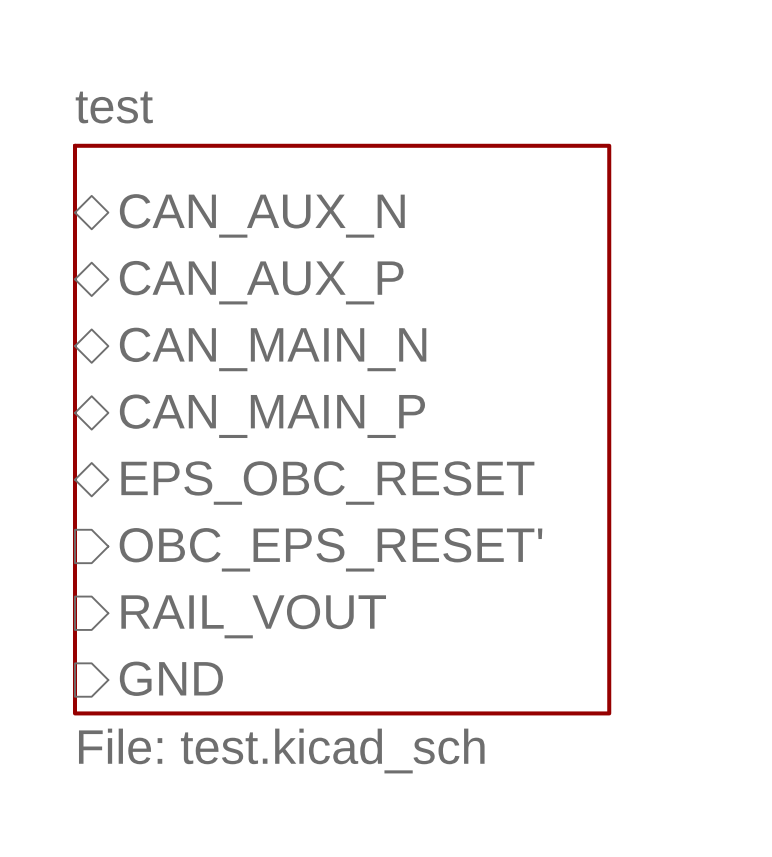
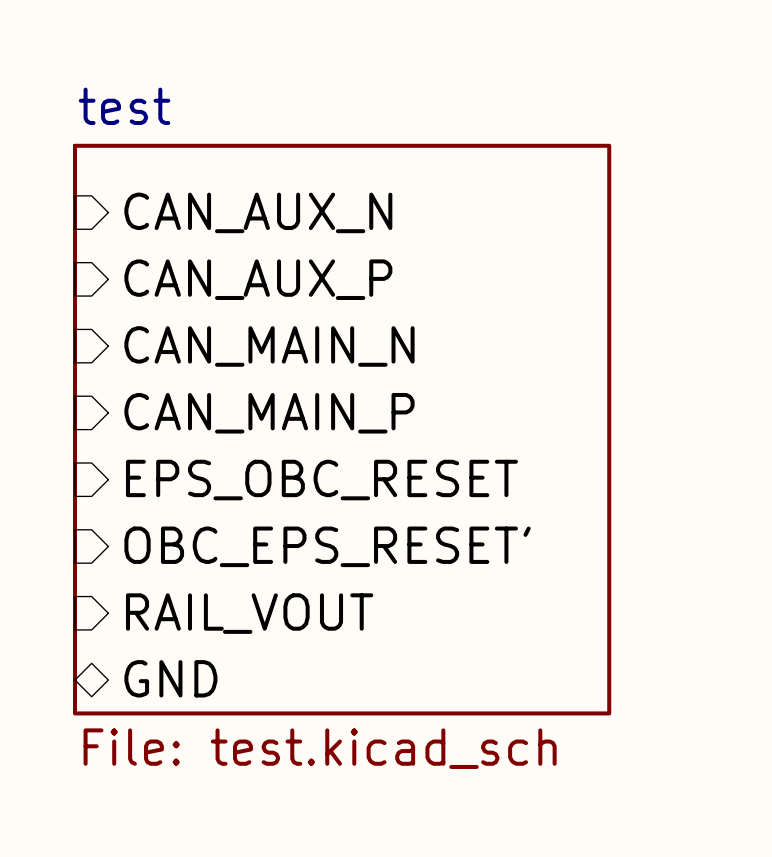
sheet pin shape: bidirectional (262, 215) -> input (258, 212)
sheet pin shape: bidirectional (261, 282) -> input (258, 279)
sheet pin shape: bidirectional (273, 349) -> input (269, 346)
sheet pin shape: bidirectional (272, 416) -> input (269, 413)
sheet pin shape: bidirectional (327, 483) -> input (321, 480)
sheet pin shape: input (171, 678) -> bidirectional (170, 678)

